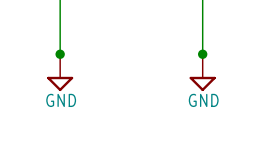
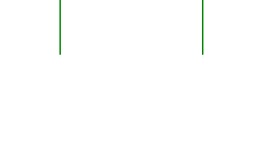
junction: (60, 54) -> none
junction: (202, 54) -> none
power symbol: GND (60, 72) -> none
power symbol: GND (202, 72) -> none

